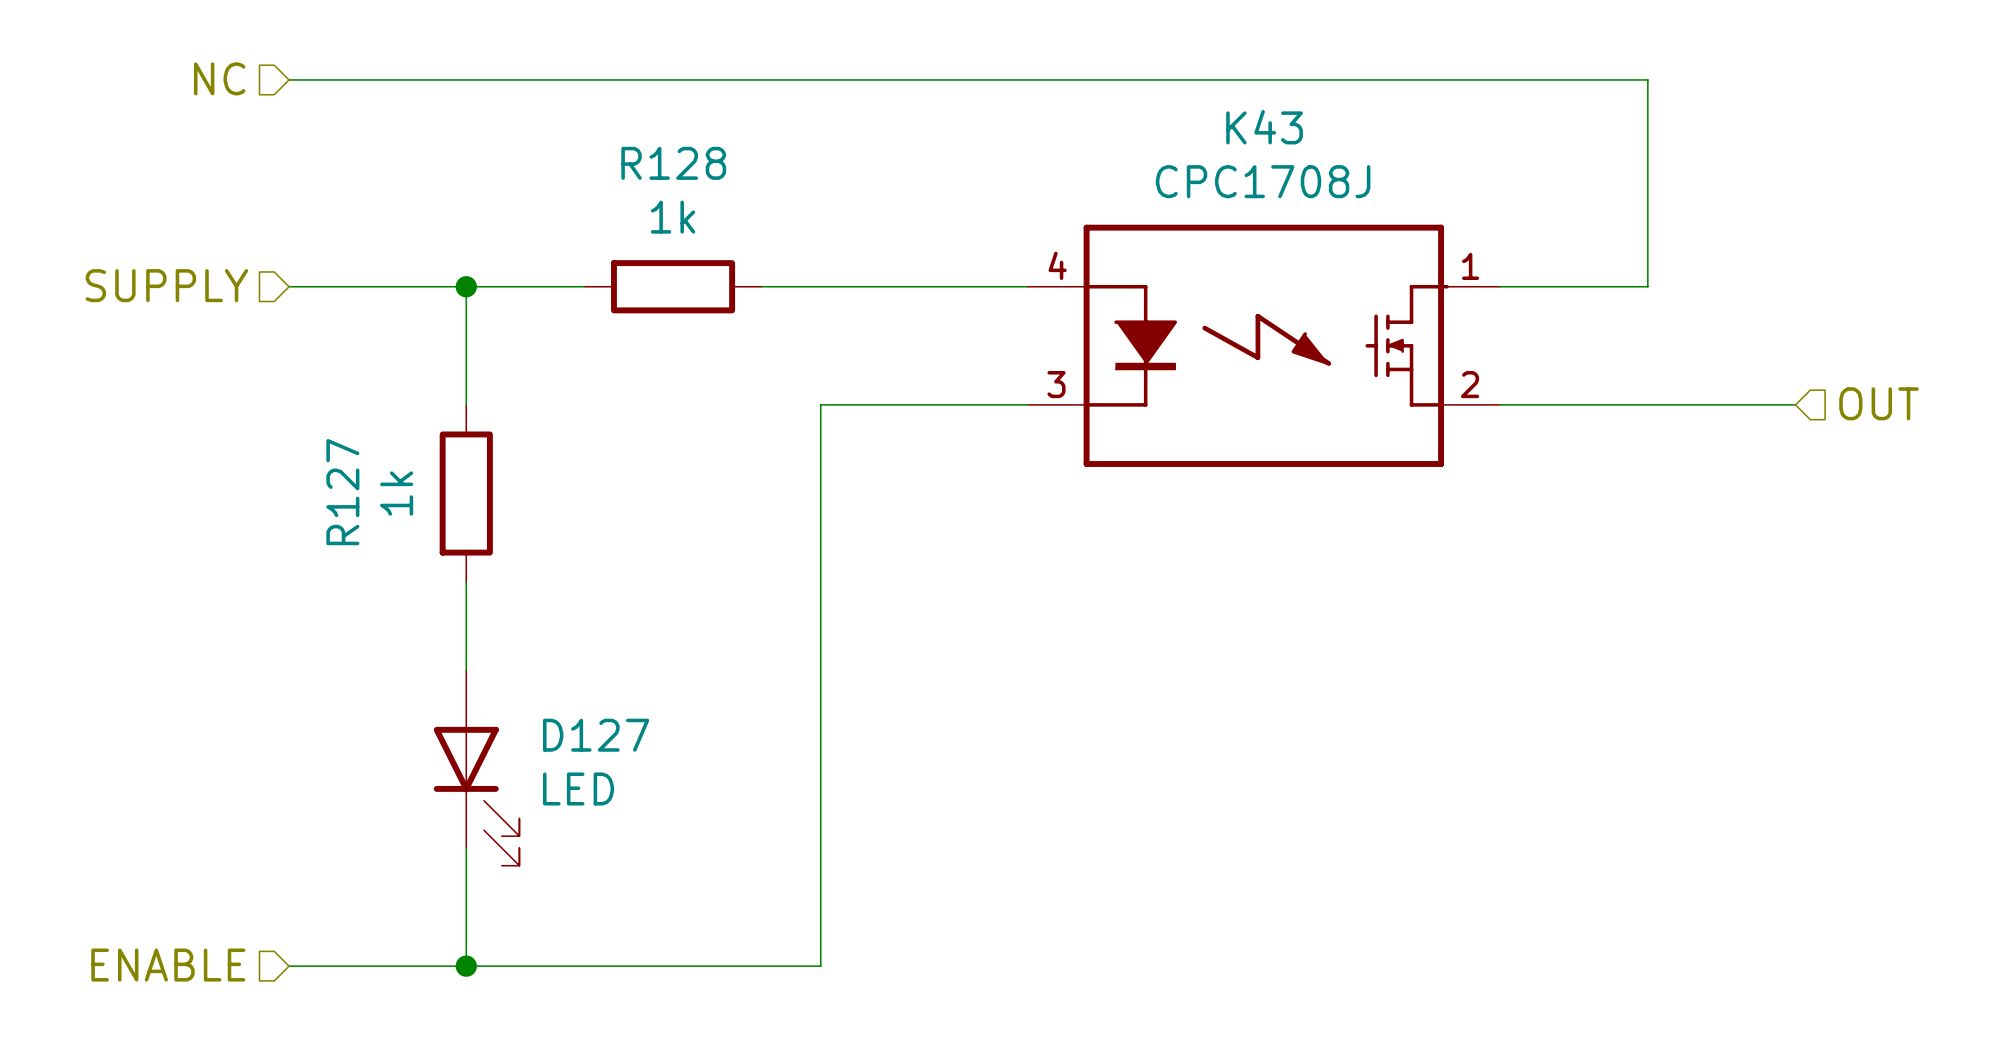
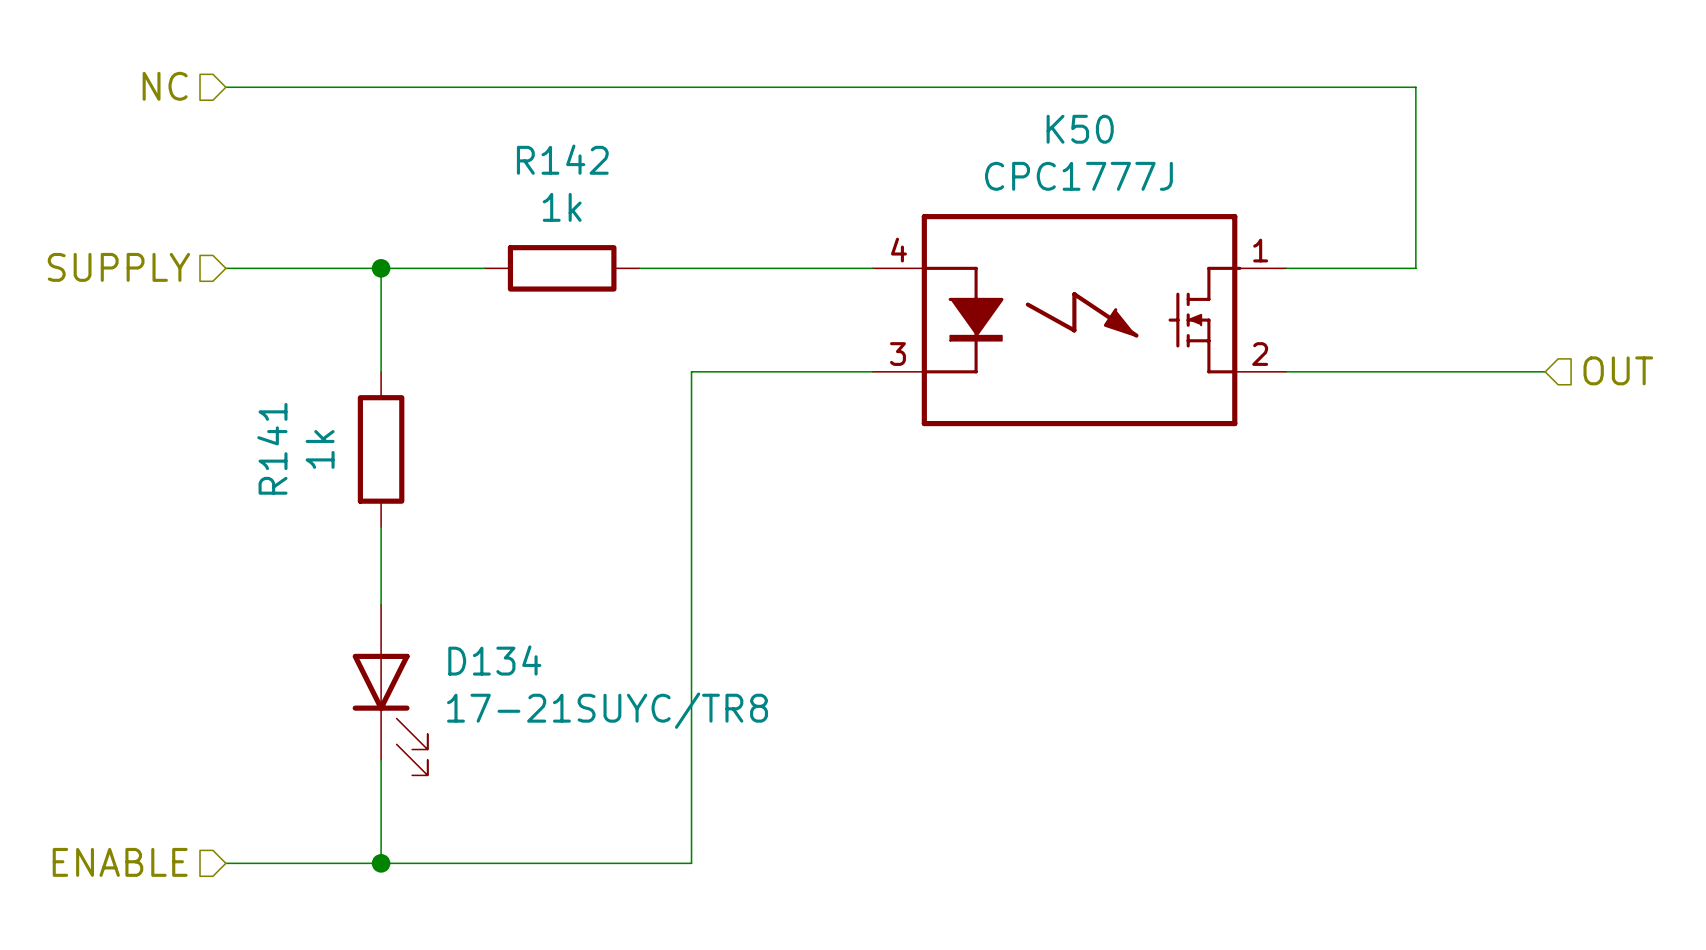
K43 name: K43 (1264, 127) -> K50 (1080, 129)
R128 name: R128 (673, 163) -> R142 (562, 159)
K43 value: CPC1708J (1263, 181) -> CPC1777J (1078, 176)
R127 name: R127 (342, 492) -> R141 (272, 448)
D127 name: D127 (596, 735) -> D134 (494, 660)
D127 value: LED (578, 788) -> 17-21SUYC/TR8 (607, 710)

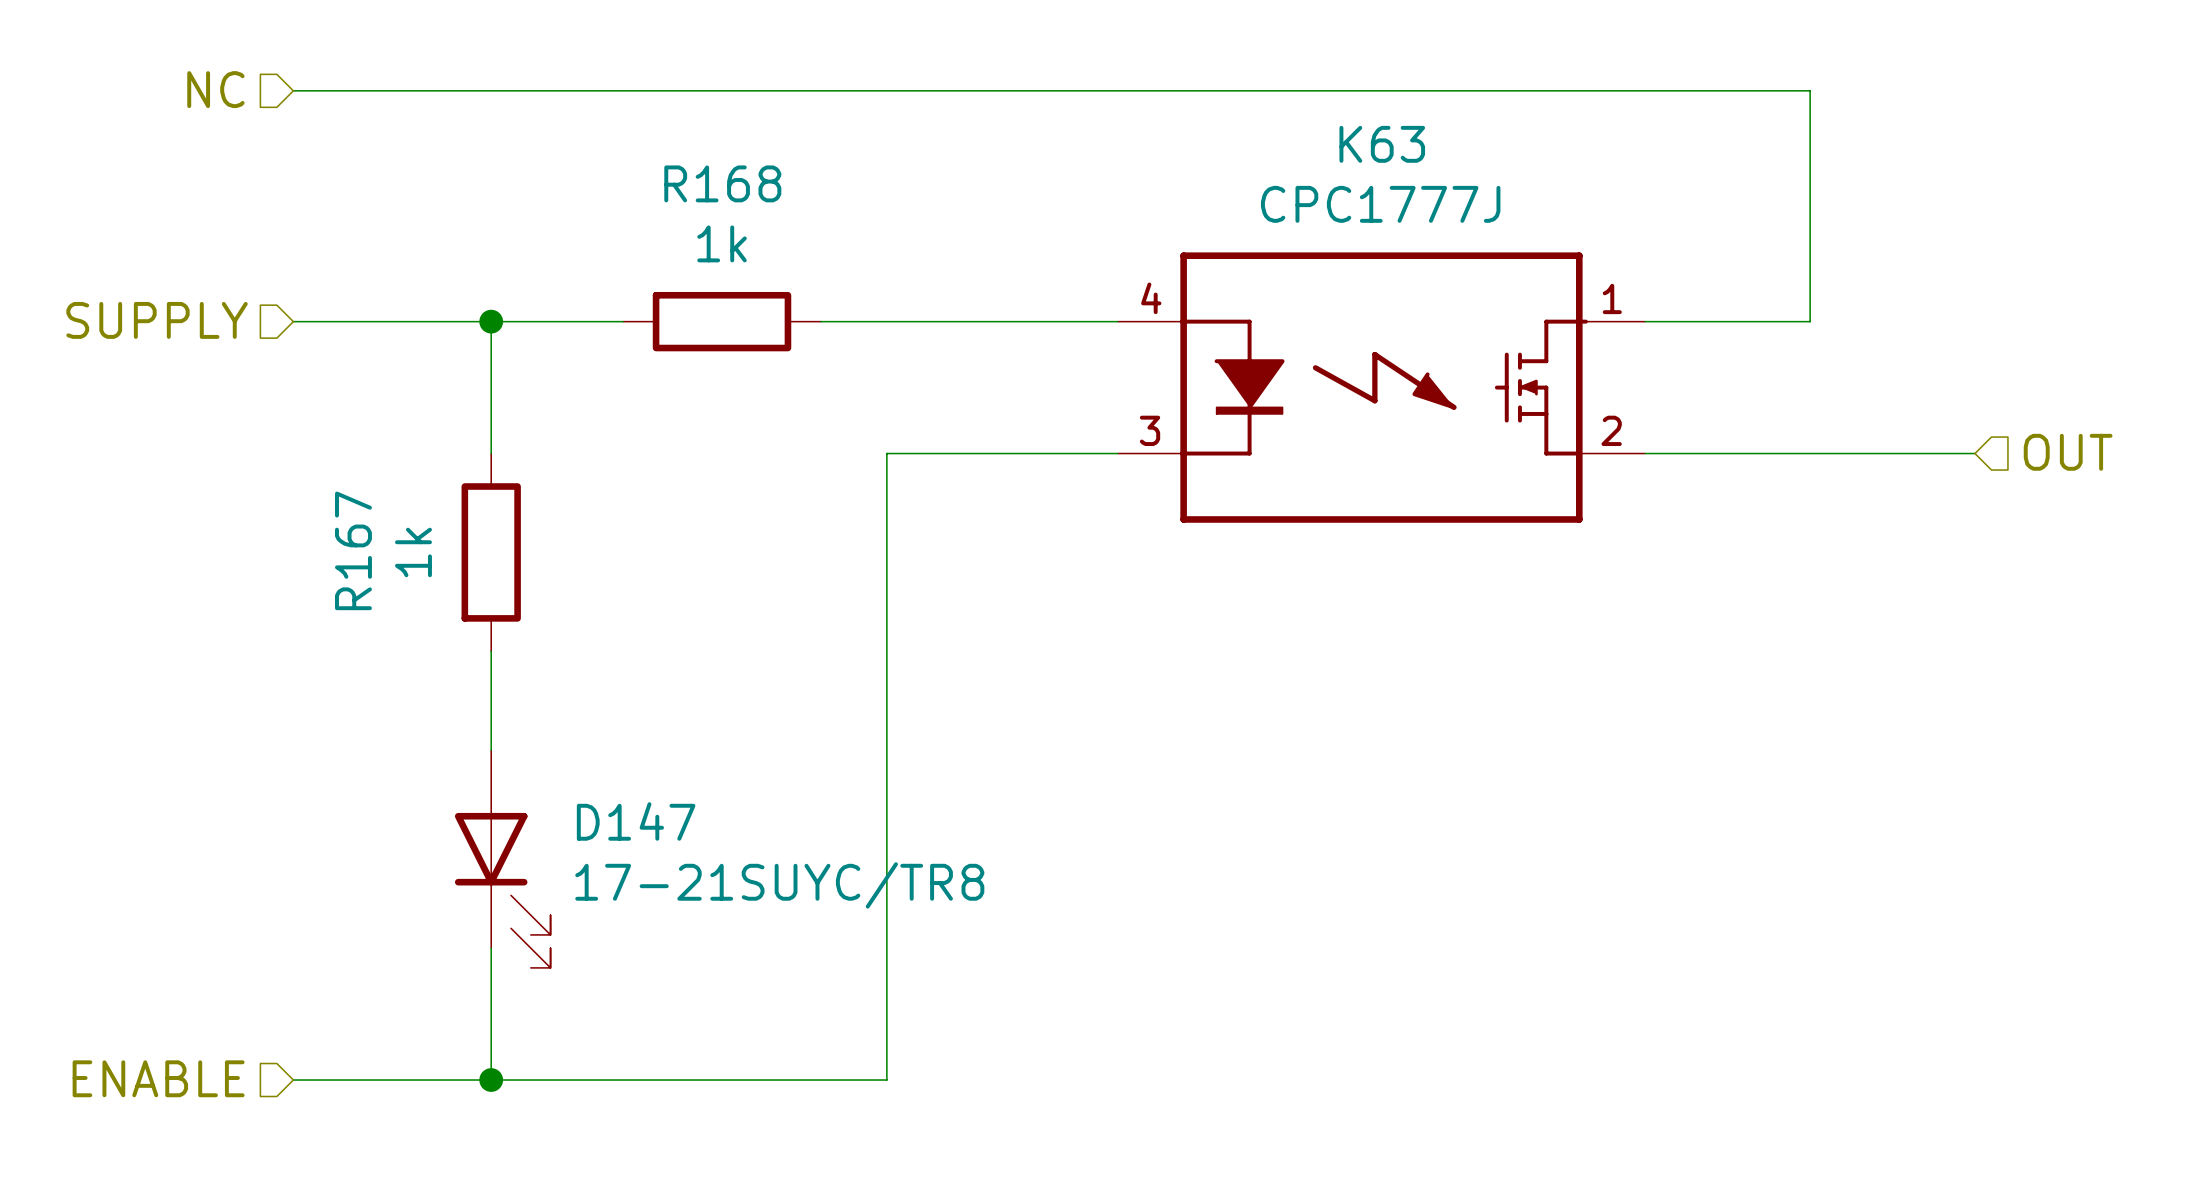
K50 name: K50 (1080, 129) -> K63 (1382, 144)
R142 name: R142 (562, 159) -> R168 (722, 183)
R141 name: R141 (272, 448) -> R167 (353, 550)
D134 name: D134 (494, 660) -> D147 (636, 821)

